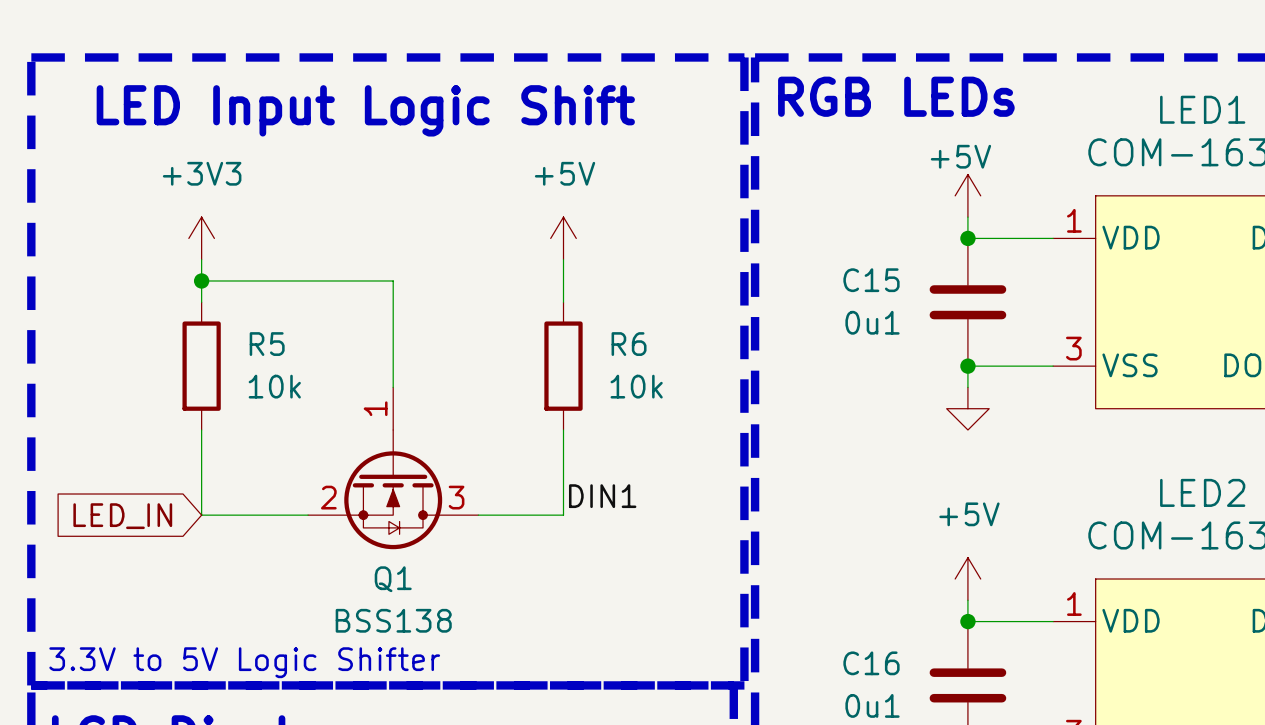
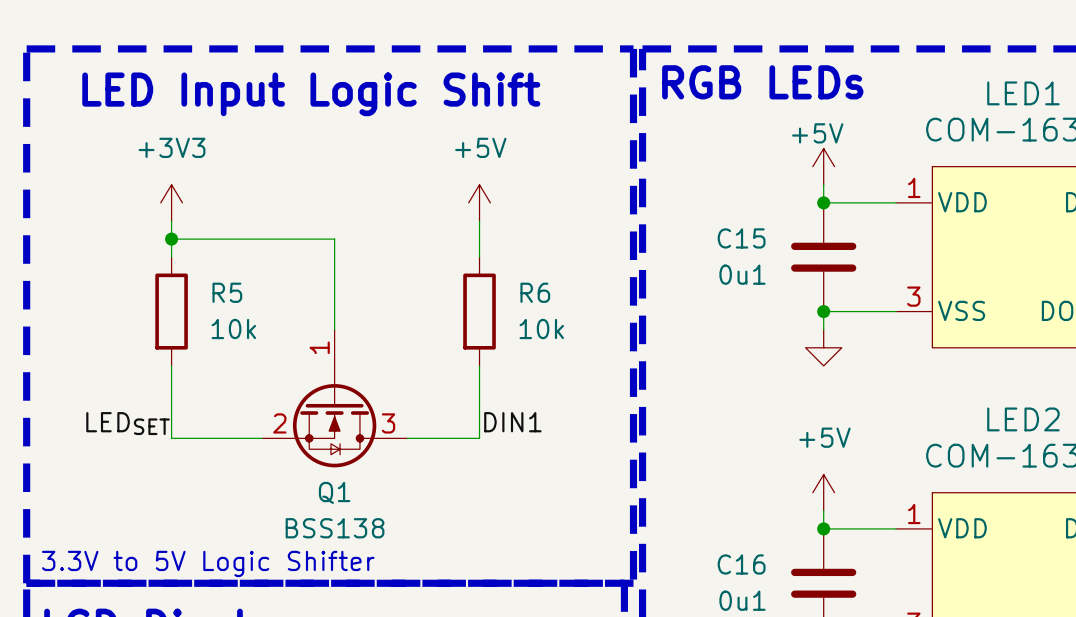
label: none -> LEDSET (128, 423)
global label: LED_IN (122, 516) -> none

